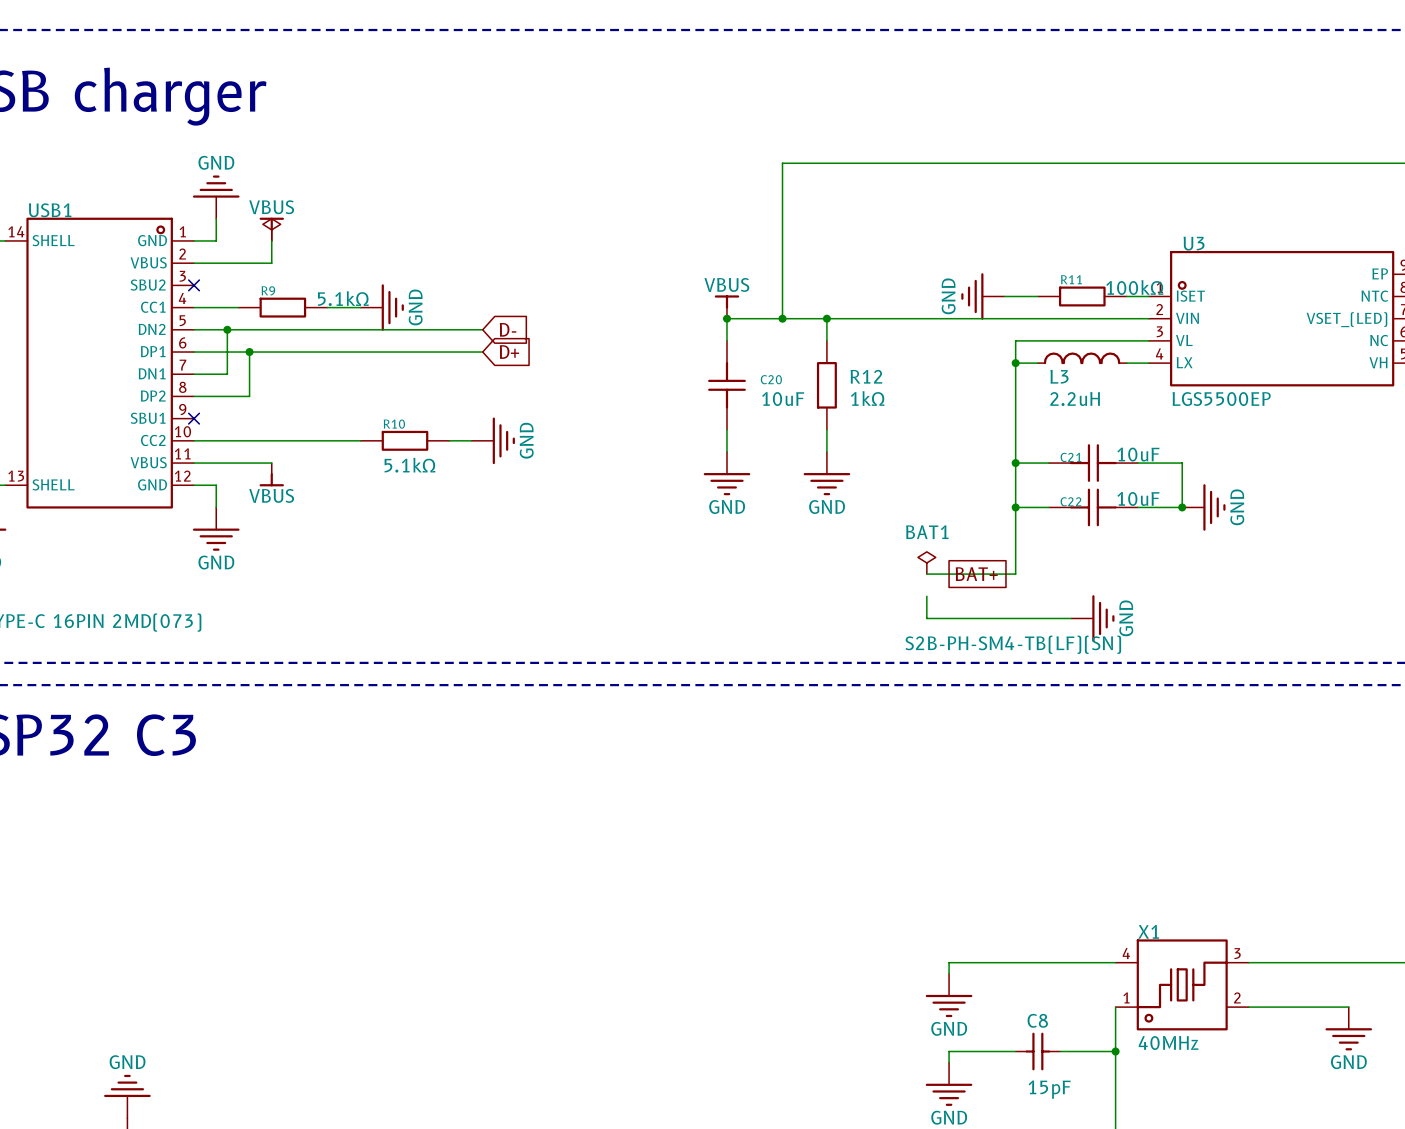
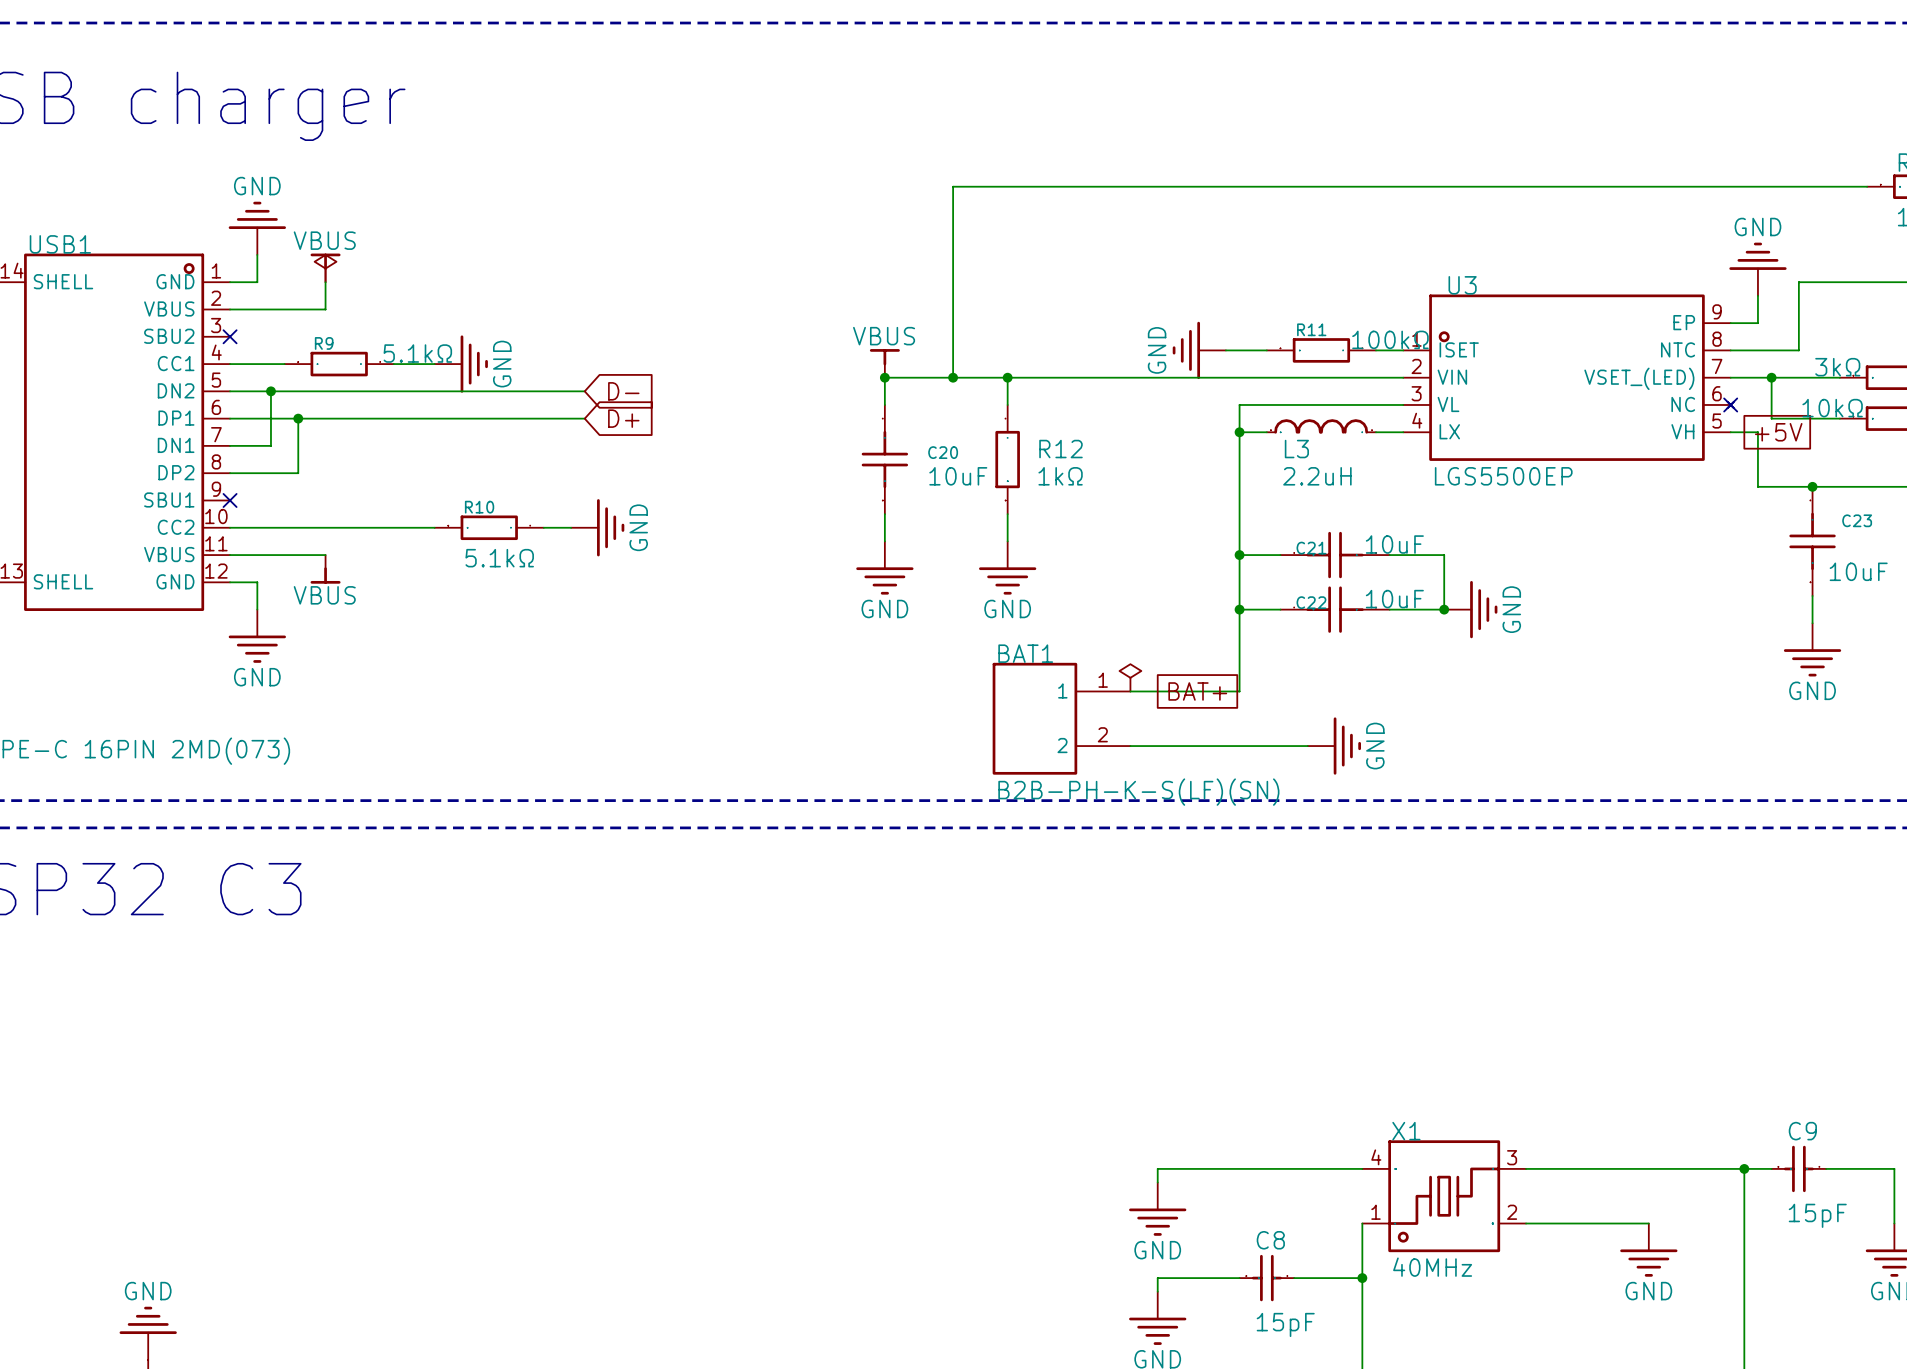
BAT1 symbol: [905, 525, 1122, 654] -> [992, 662, 1131, 775]
BAT1 name position: BAT1 (927, 532) -> BAT1 (1025, 653)
wire: (926, 596) (926, 618) -> none
BAT1 value: S2B-PH-SM4-TB(LF)(SN) (1013, 644) -> B2B-PH-K-S(LF)(SN) (1138, 792)

